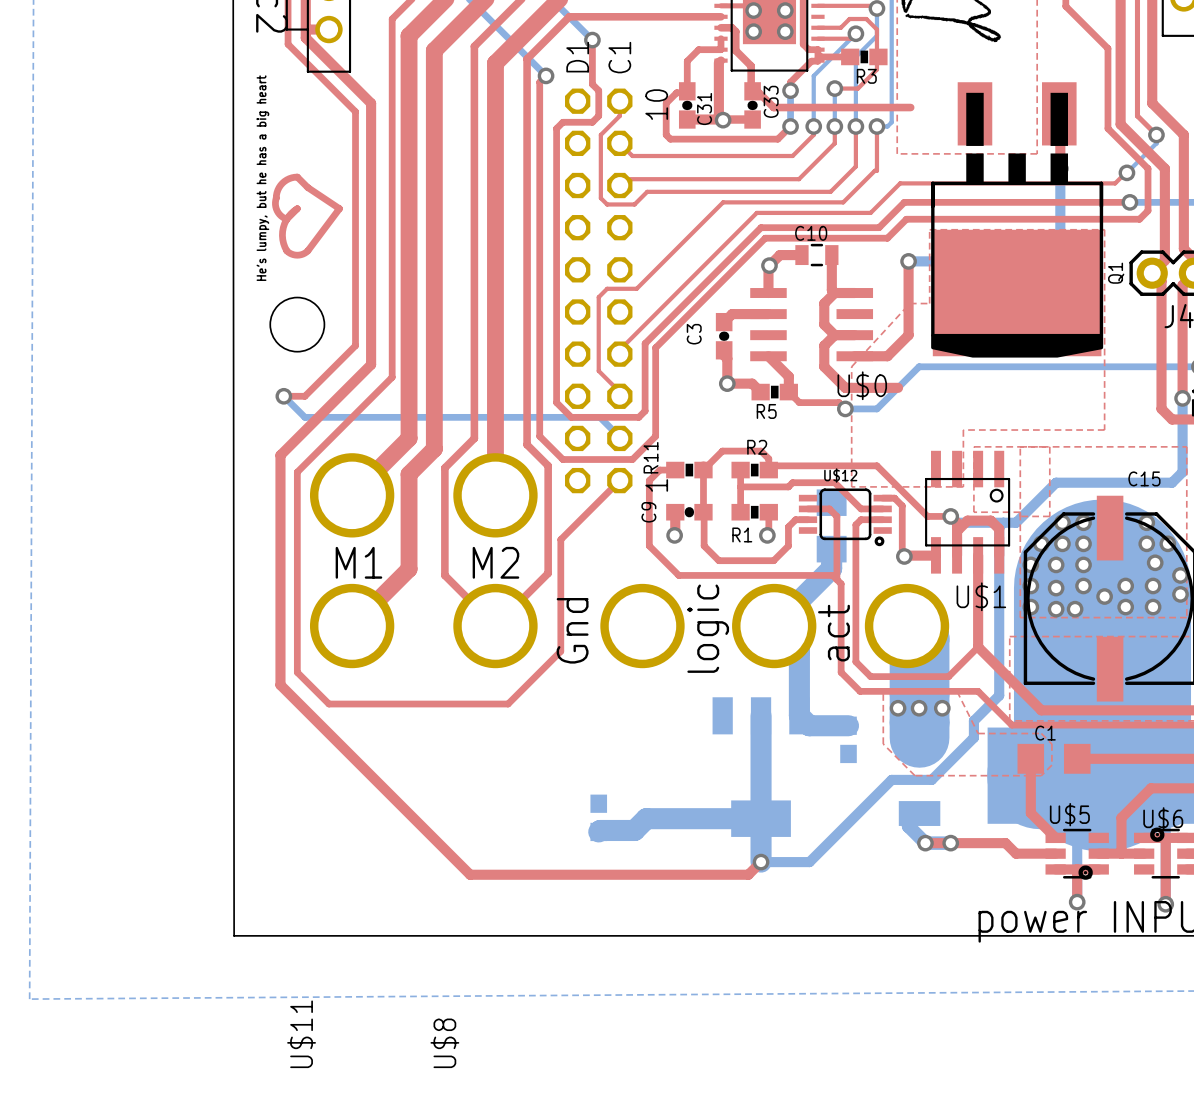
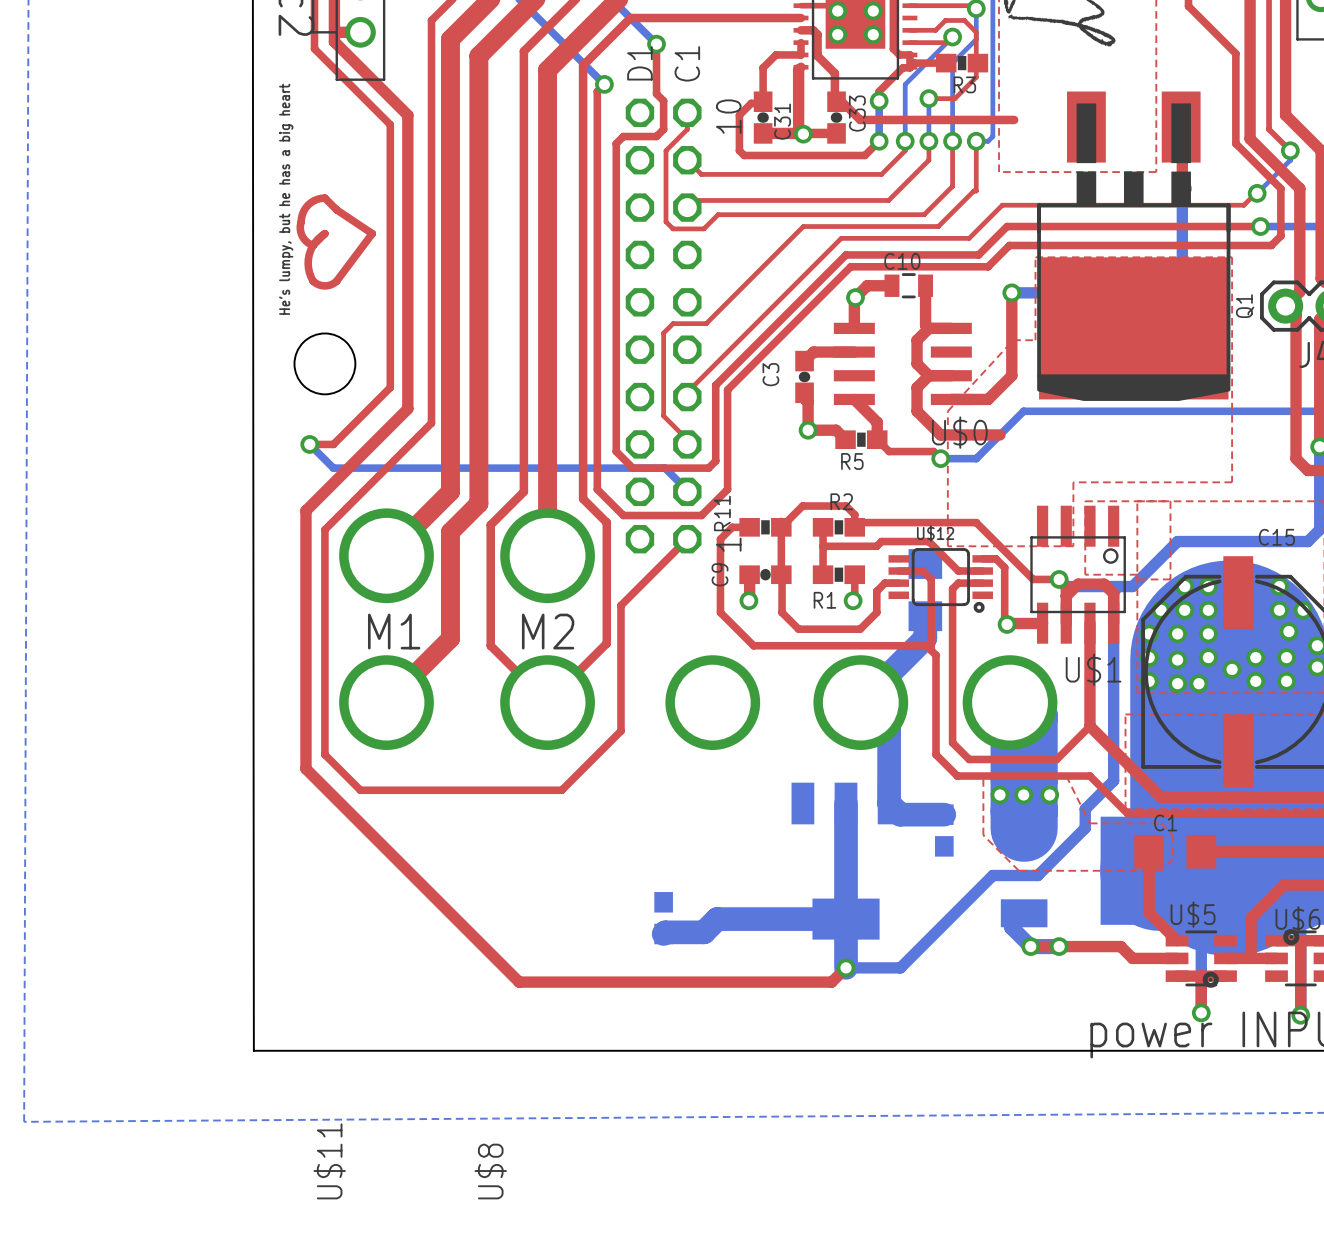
text: logic (708, 628) -> none
text: Gnd (572, 630) -> none
text: act (833, 633) -> none

